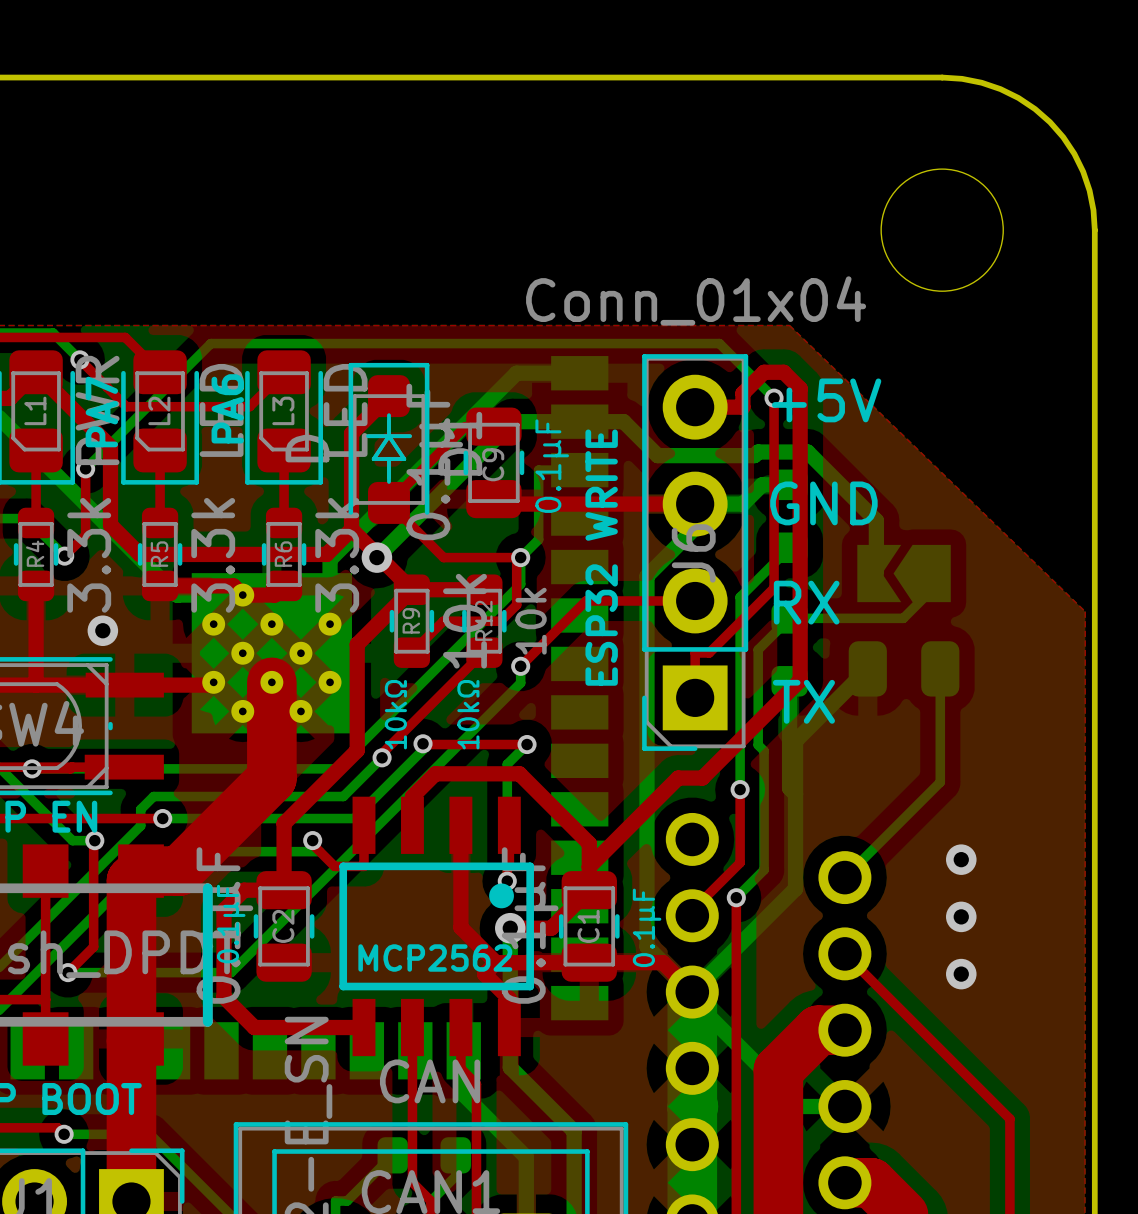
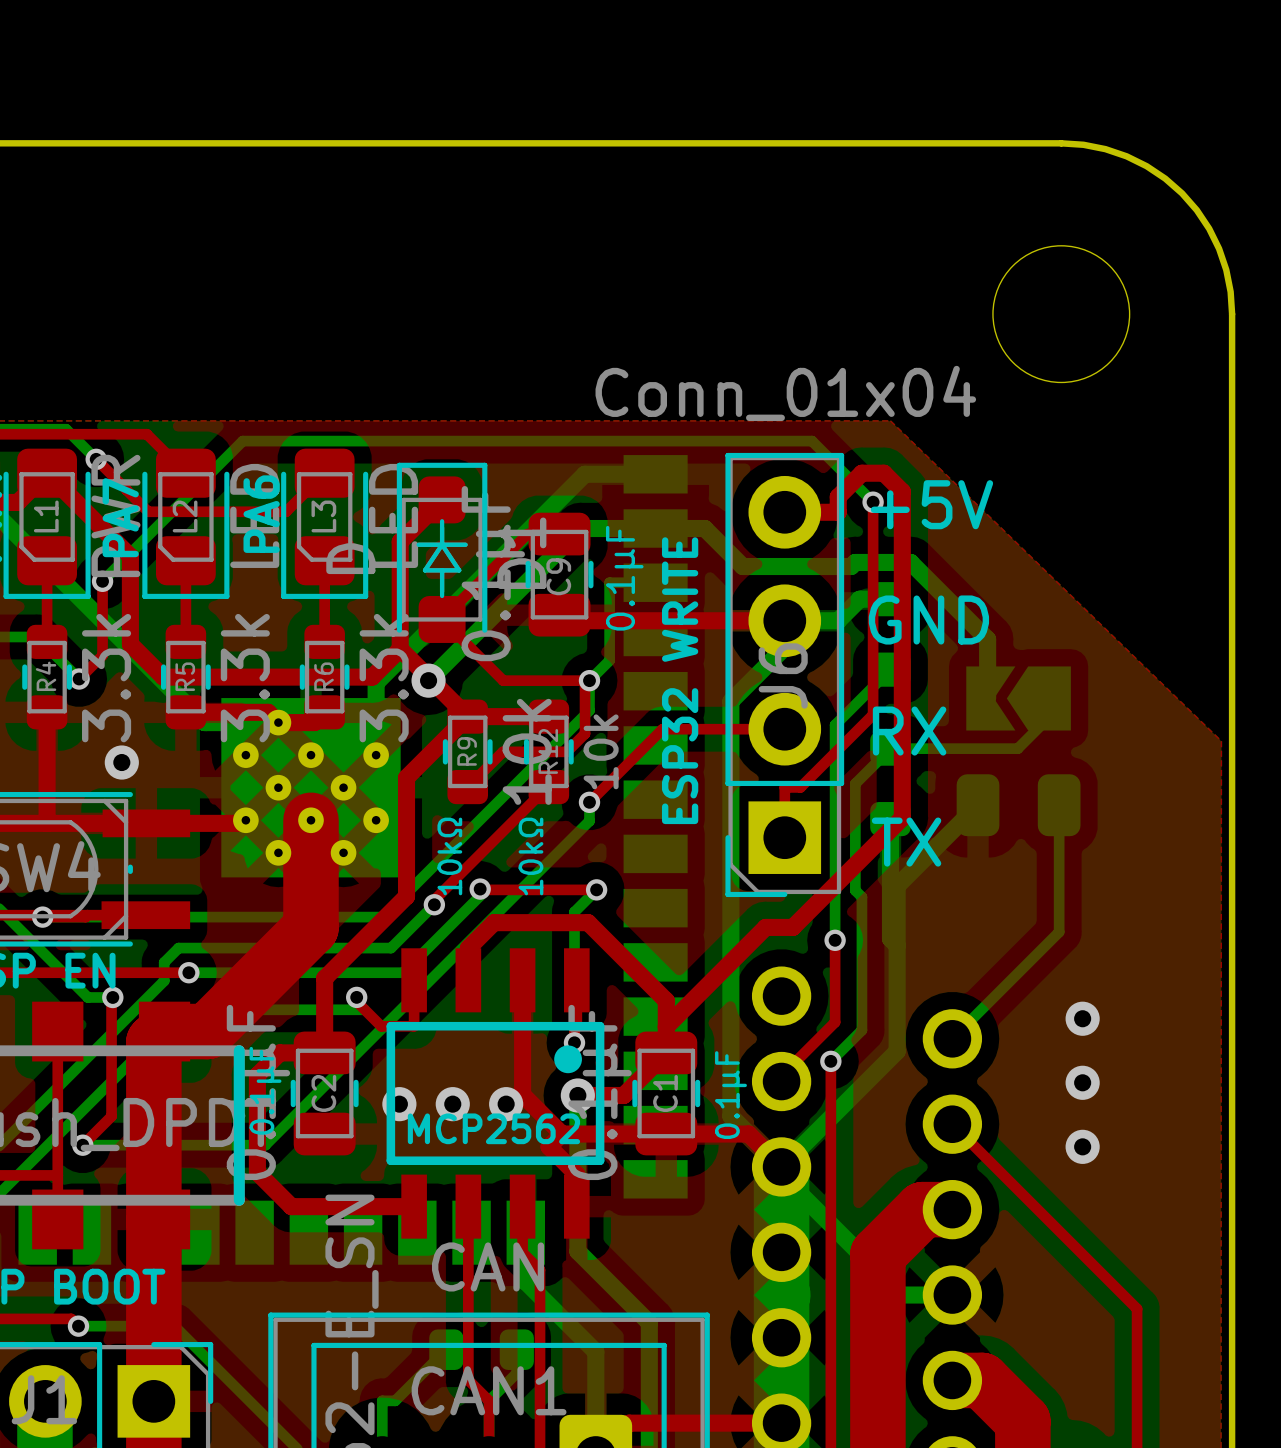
via: none -> (399, 1104)
via: none -> (452, 1104)
via: none -> (506, 1104)

